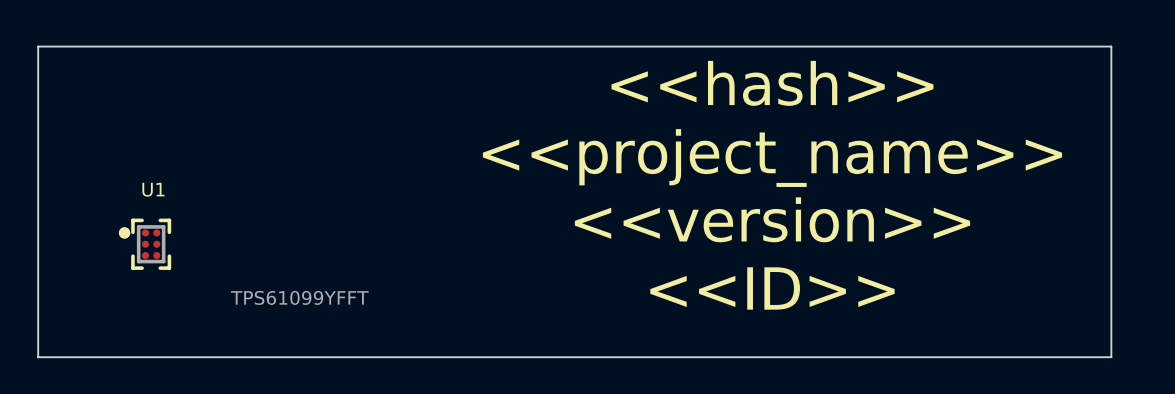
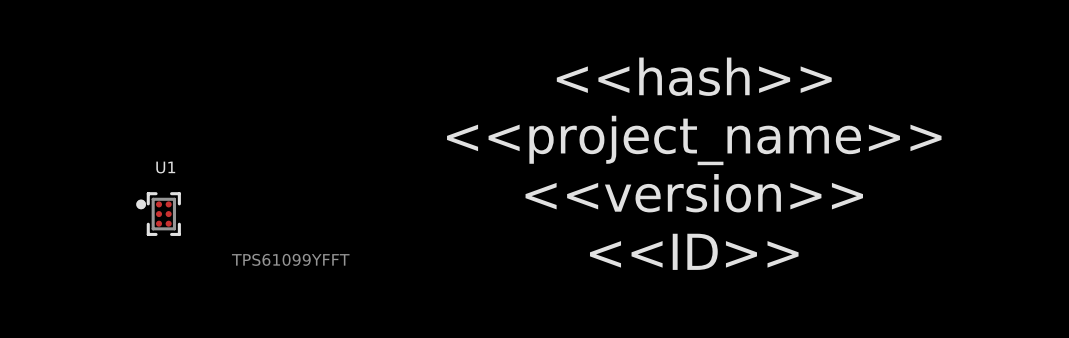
board edge: (38, 46) (1111, 46) (1111, 357) (38, 357) (38, 46) -> none

